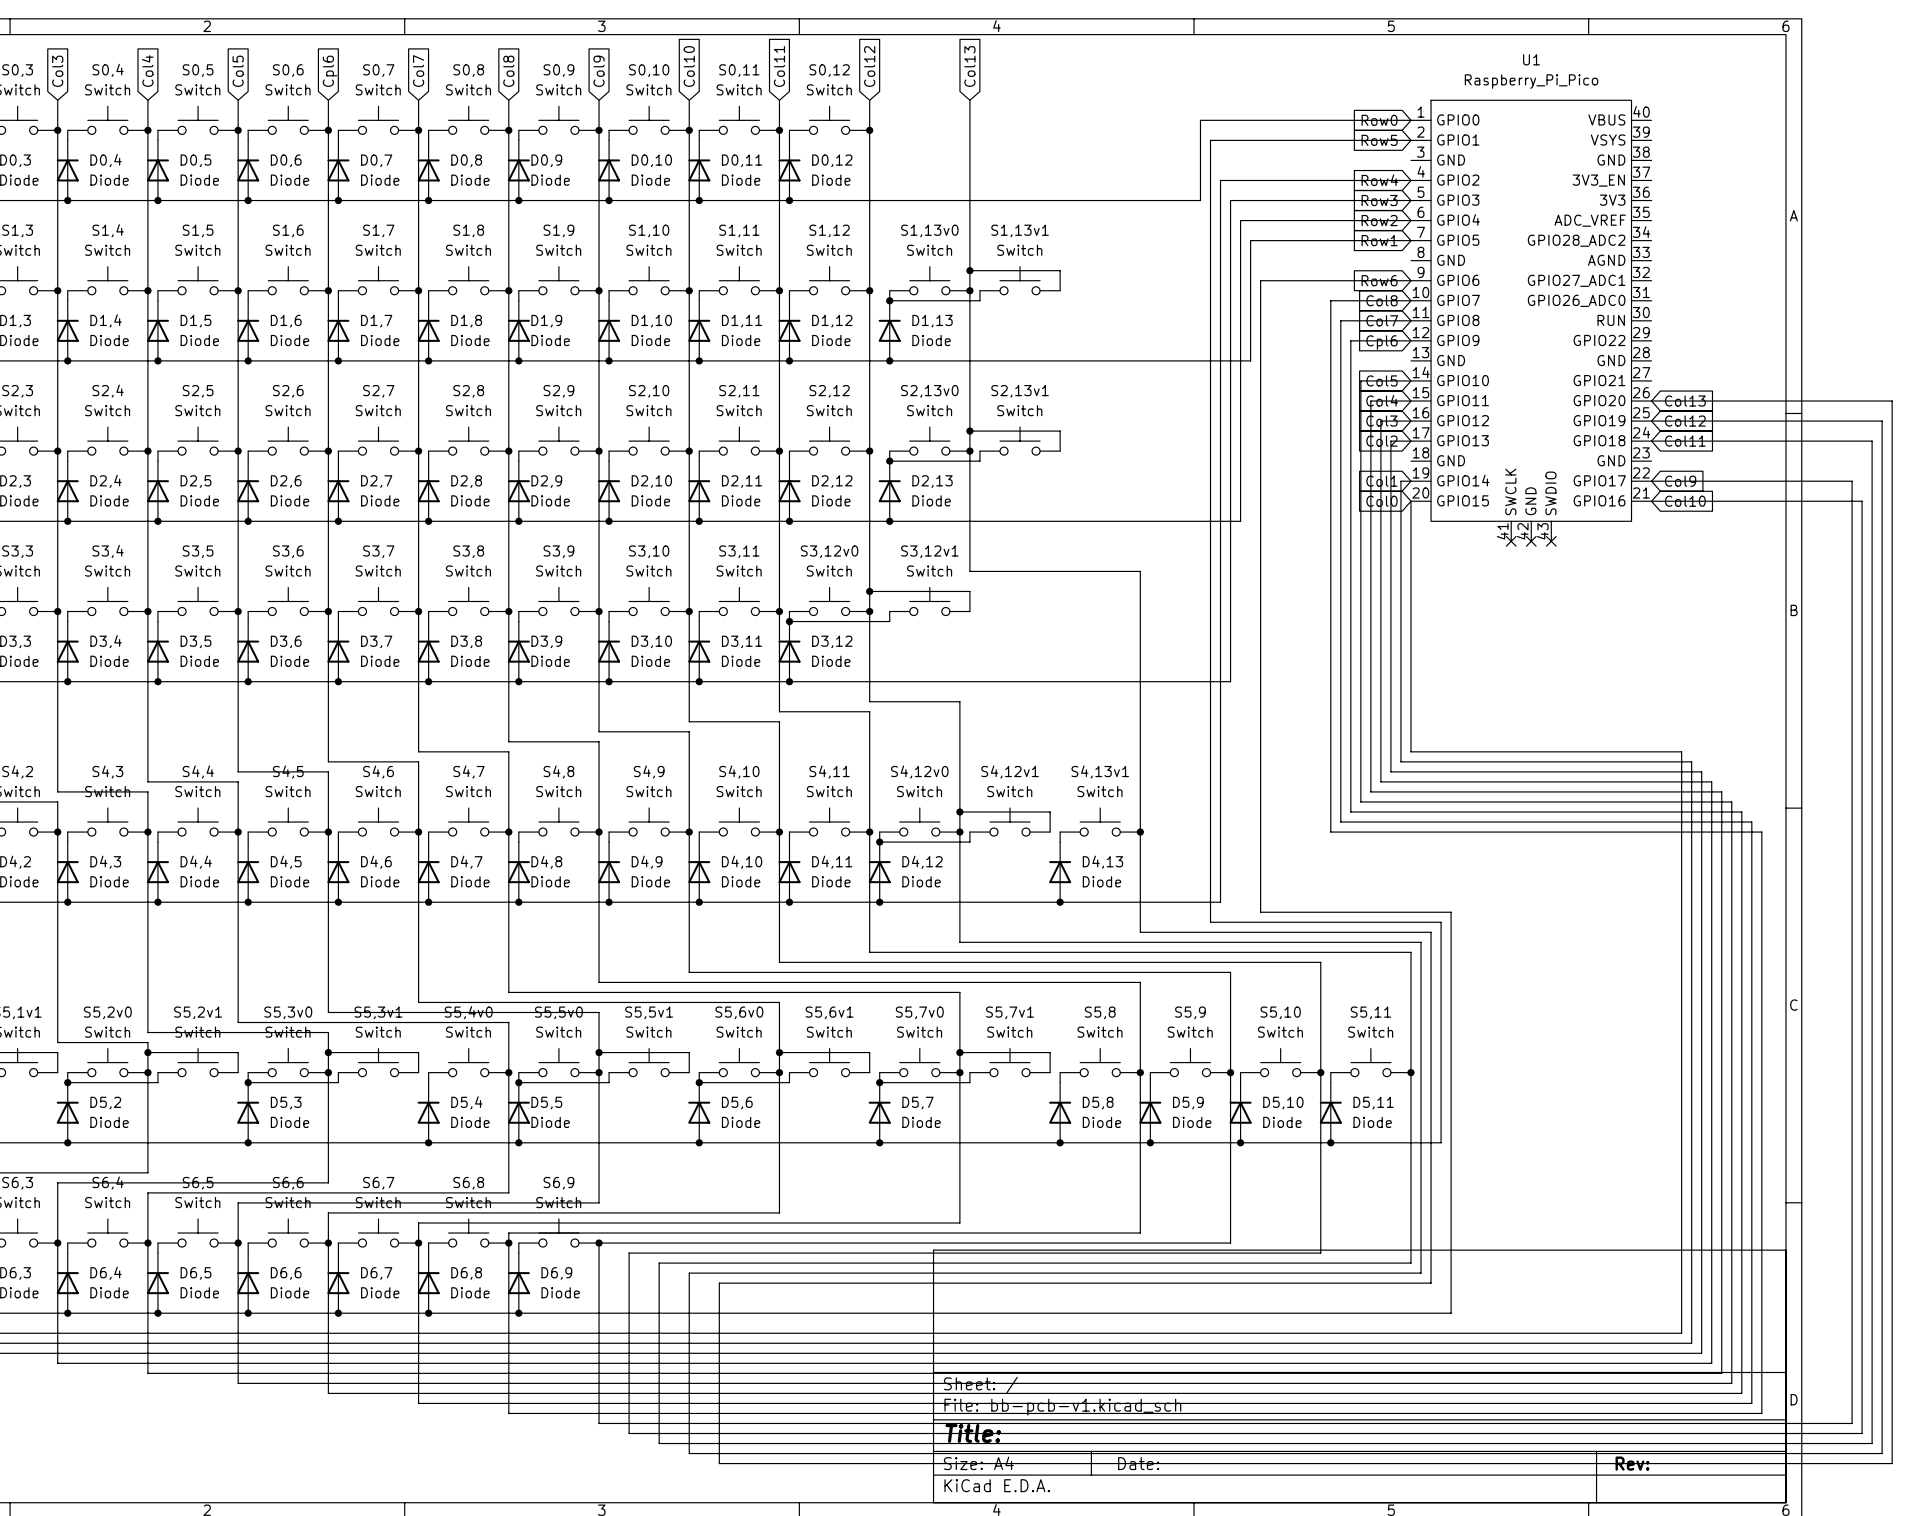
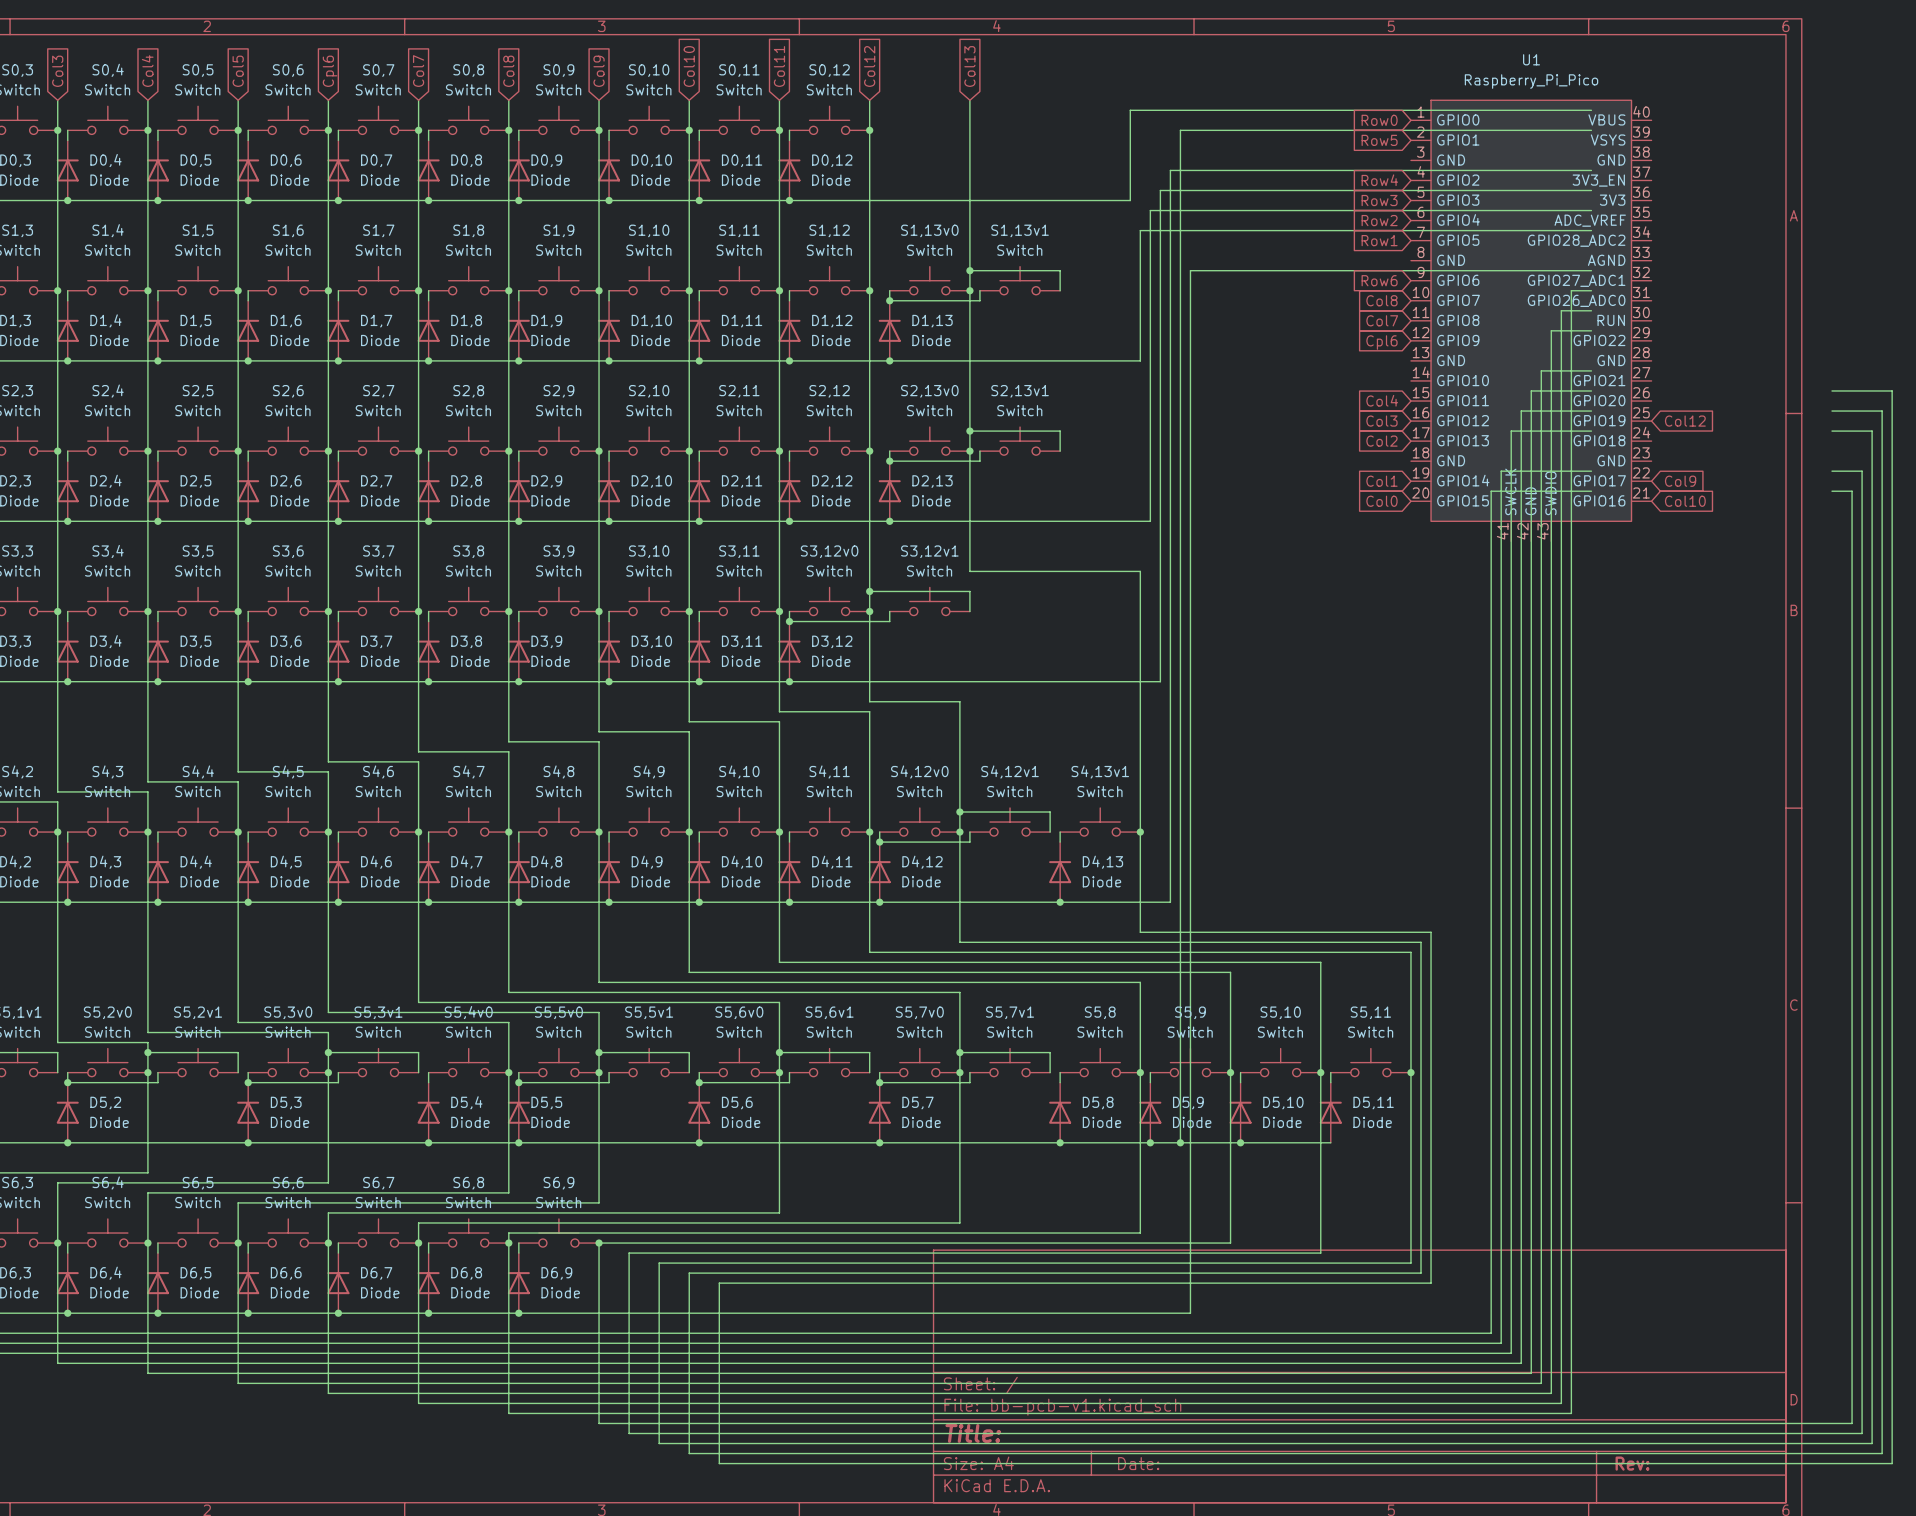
wire: (1410, 120) (1200, 120) (1200, 200) (1130, 200) -> (1591, 110) (1130, 110) (1130, 200)
wire: none -> (1591, 130) (1180, 130) (1180, 1142)
wire: (1410, 140) (1210, 140) (1210, 922) (1441, 922) (1441, 1142) (1330, 1142) -> none
wire: (1410, 180) (1220, 180) (1220, 902) (1170, 902) -> (1591, 170) (1170, 170) (1170, 902)
wire: (1410, 200) (1230, 200) (1230, 681) (1160, 681) -> (1591, 190) (1160, 190) (1160, 681)
wire: (1410, 220) (1240, 220) (1240, 521) (1150, 521) -> (1591, 210) (1150, 210) (1150, 521)
wire: (1410, 240) (1250, 240) (1250, 360) (1140, 360) -> (1591, 230) (1140, 230) (1140, 360)
wire: (1410, 280) (1260, 280) (1260, 912) (1451, 912) (1451, 1313) (1190, 1313) -> (1591, 270) (1190, 270) (1190, 1313)
wire: (1410, 300) (1330, 300) (1330, 832) (1761, 832) (1761, 1413) (1571, 1413) -> (1591, 290) (1571, 290) (1571, 1413)
wire: (1410, 320) (1340, 320) (1340, 822) (1751, 822) (1751, 1403) (1561, 1403) -> (1591, 310) (1561, 310) (1561, 1403)
wire: (1410, 340) (1350, 340) (1350, 812) (1741, 812) (1741, 1393) (1551, 1393) -> (1591, 330) (1551, 330) (1551, 1393)
global label: Col5 (1381, 380) -> none
wire: (1410, 380) (1360, 380) (1360, 801) (1731, 801) (1731, 1383) (1541, 1383) -> (1591, 370) (1541, 370) (1541, 1383)
wire: (1410, 401) (1370, 401) (1370, 791) (1721, 791) (1721, 1373) (1531, 1373) -> (1591, 390) (1531, 390) (1531, 1373)
wire: (1651, 401) (1892, 401) -> (1832, 390) (1892, 390) (1892, 401)
global label: Col13 (1685, 401) -> none
wire: (1410, 421) (1380, 421) (1380, 781) (1711, 781) (1711, 1363) (1521, 1363) -> (1591, 411) (1521, 411) (1521, 1363)
wire: (1651, 421) (1882, 421) -> (1832, 411) (1882, 411) (1882, 421)
wire: (1410, 441) (1390, 441) (1390, 771) (1701, 771) (1701, 1353) (1511, 1353) -> (1591, 431) (1511, 431) (1511, 1353)
wire: (1651, 441) (1872, 441) -> (1832, 431) (1872, 431) (1872, 441)
global label: Col11 (1685, 441) -> none
wire: (1410, 481) (1400, 481) (1400, 761) (1691, 761) (1691, 1343) (1501, 1343) -> (1591, 471) (1501, 471) (1501, 1343)
wire: (1651, 481) (1852, 481) (1852, 491) -> (1832, 491) (1852, 491)
wire: (1410, 501) (1410, 751) (1681, 751) (1681, 1333) (1491, 1333) -> (1591, 491) (1491, 491) (1491, 1333)
wire: (1651, 501) (1862, 501) -> (1832, 471) (1862, 471) (1862, 501)
no-connect mark: (1511, 541) -> none
no-connect mark: (1531, 541) -> none
no-connect mark: (1551, 541) -> none
junction: none -> (1180, 1142)
junction: (1330, 1142) -> none

